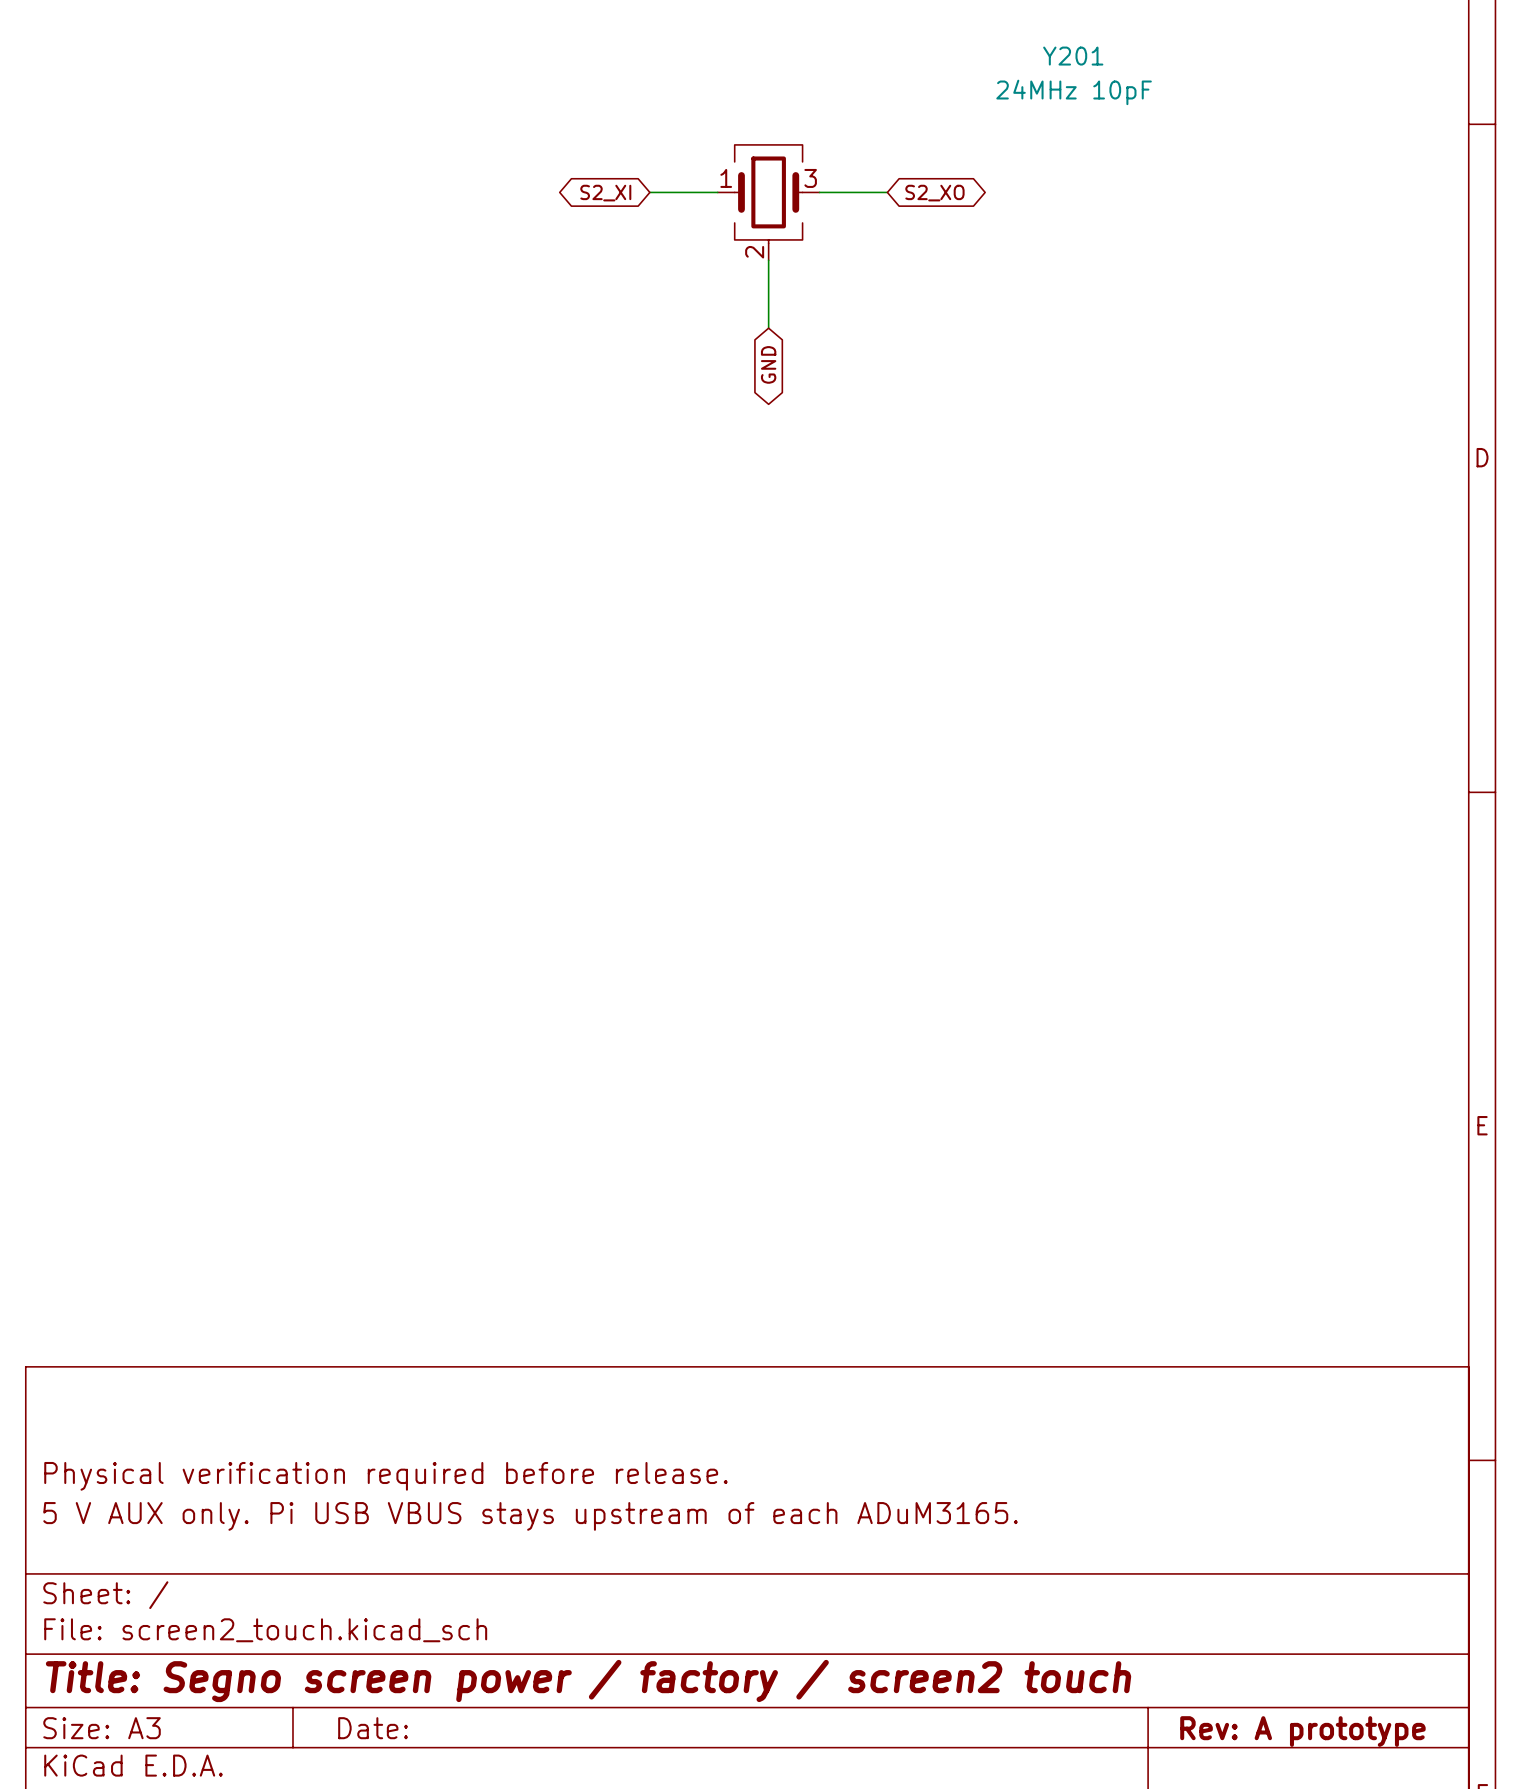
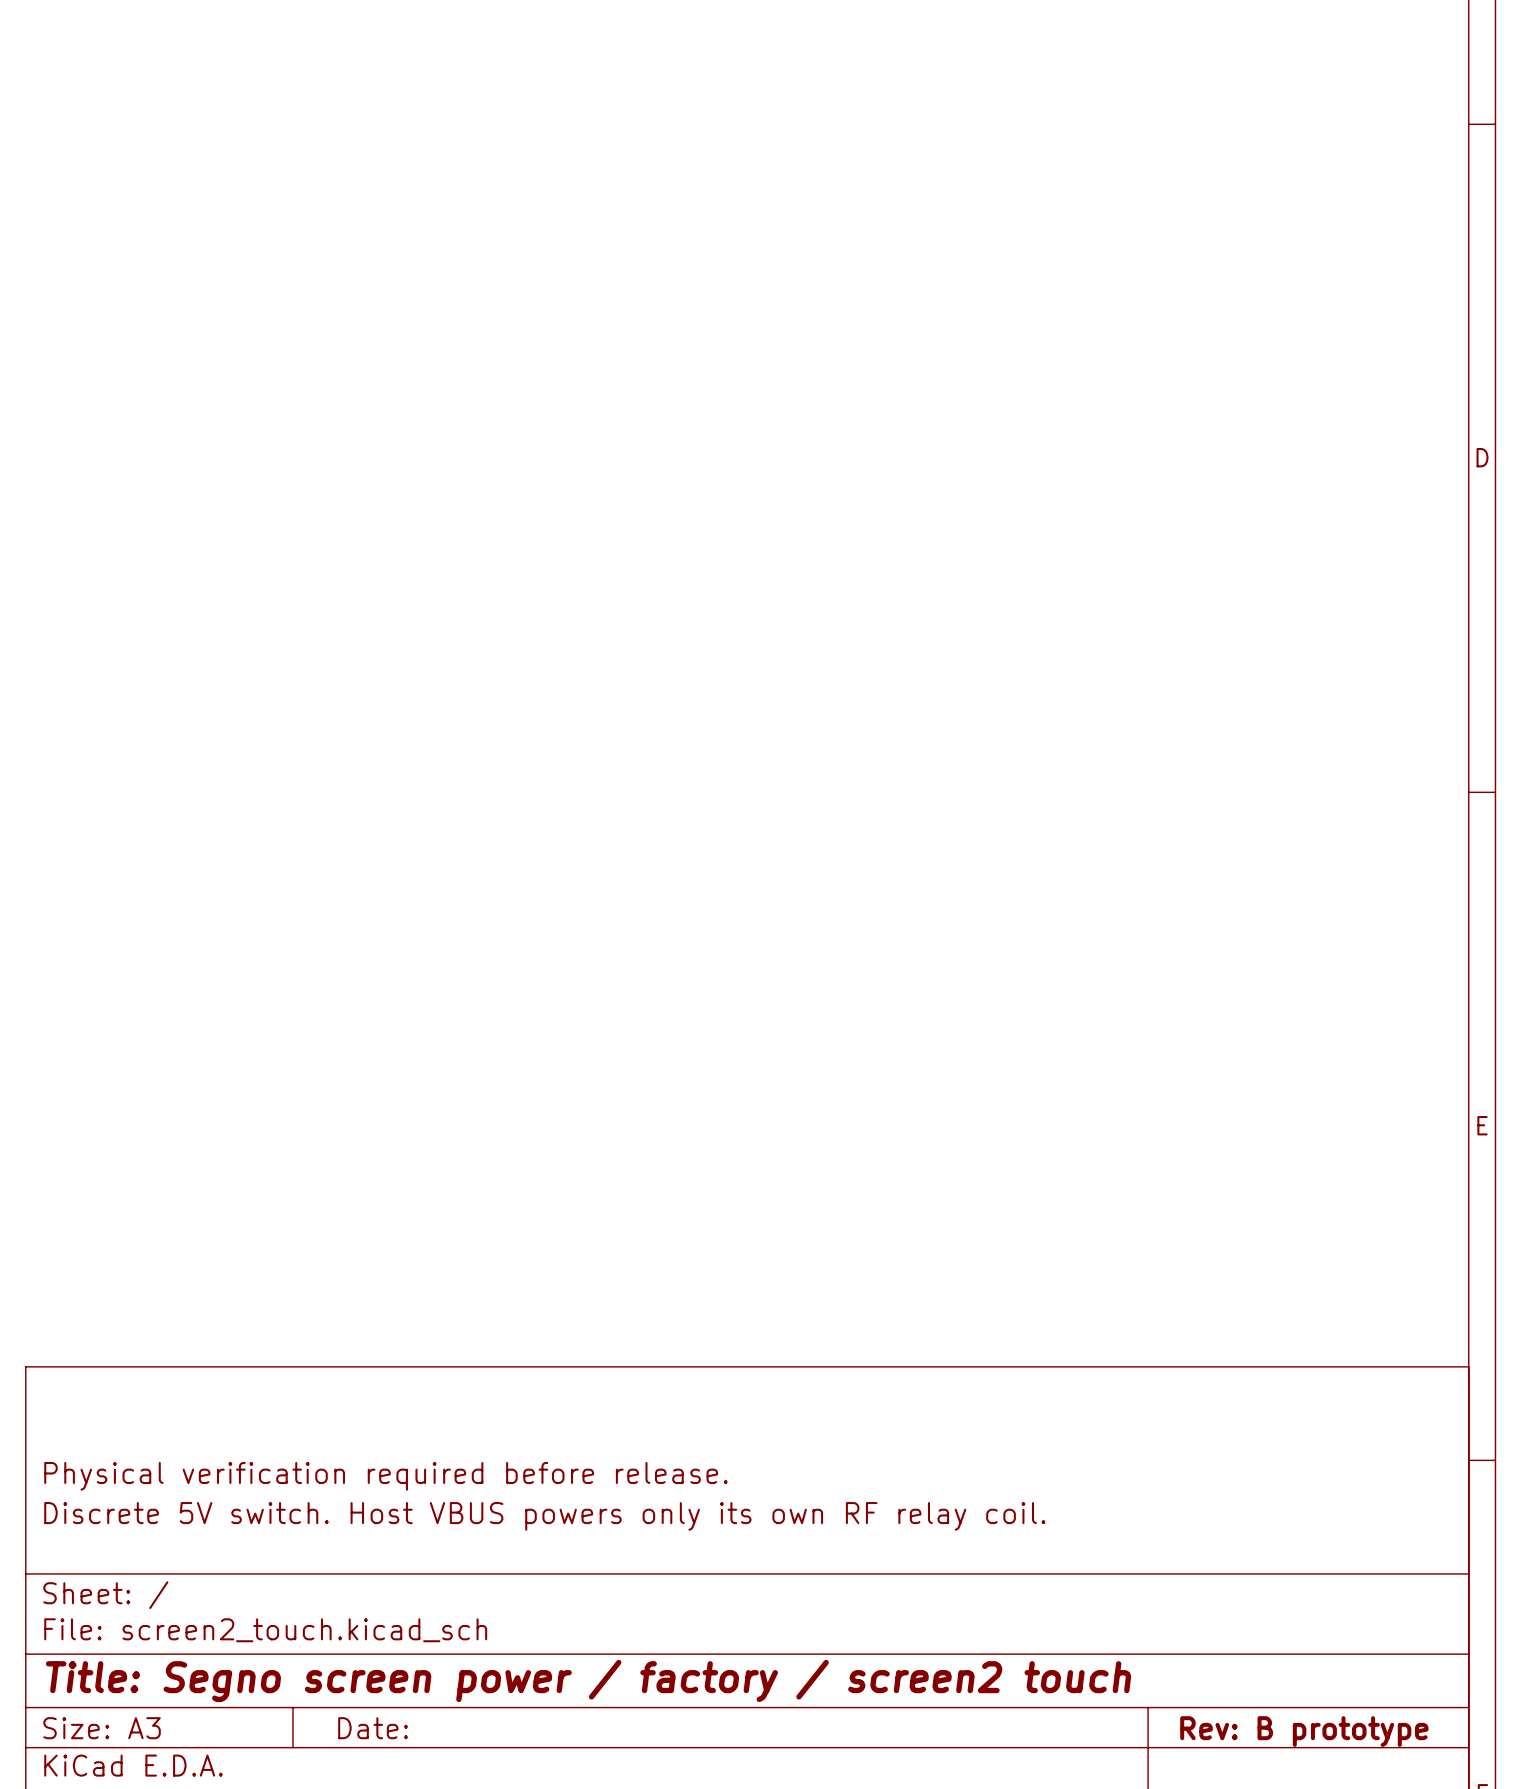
wire: (649, 192) (717, 192) -> none
wire: (819, 192) (887, 192) -> none
global label: S2_XI (605, 193) -> none
global label: S2_XO (934, 193) -> none
Y201: 24MHz 10pF (768, 202) -> none
wire: (768, 260) (768, 328) -> none
global label: GND (768, 364) -> none
title block: 5 V AUX only. Pi USB VBUS stays upstream of each ADuM3165. (530, 1516) -> Discrete 5V switch. Host VBUS powers only its own RF relay coil. (544, 1516)
title block: Rev: A prototype (1302, 1731) -> Rev: B prototype (1304, 1731)

